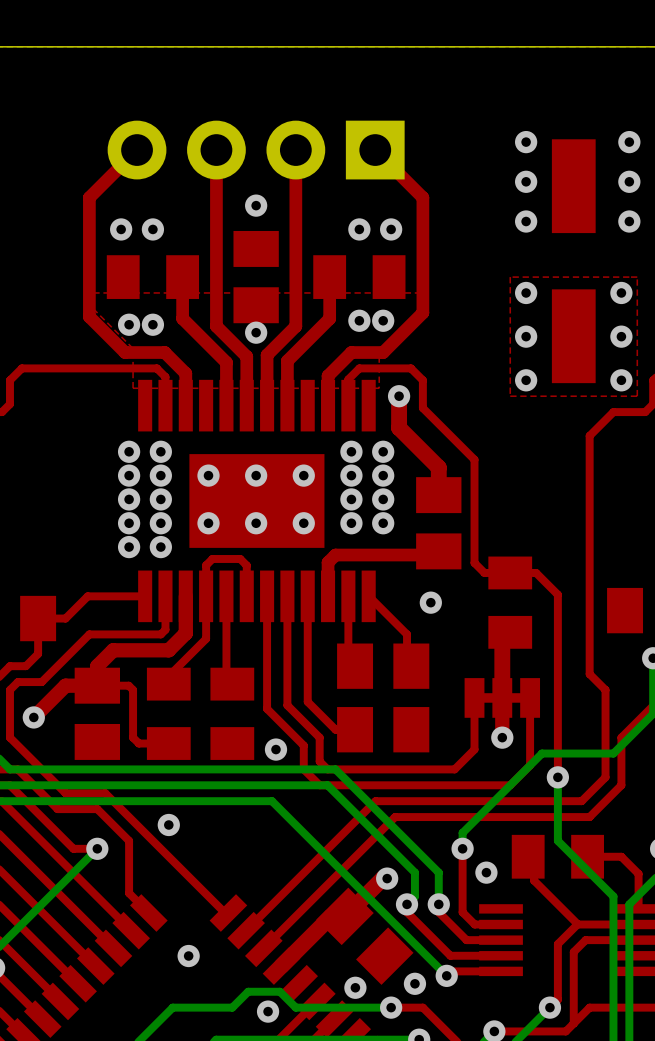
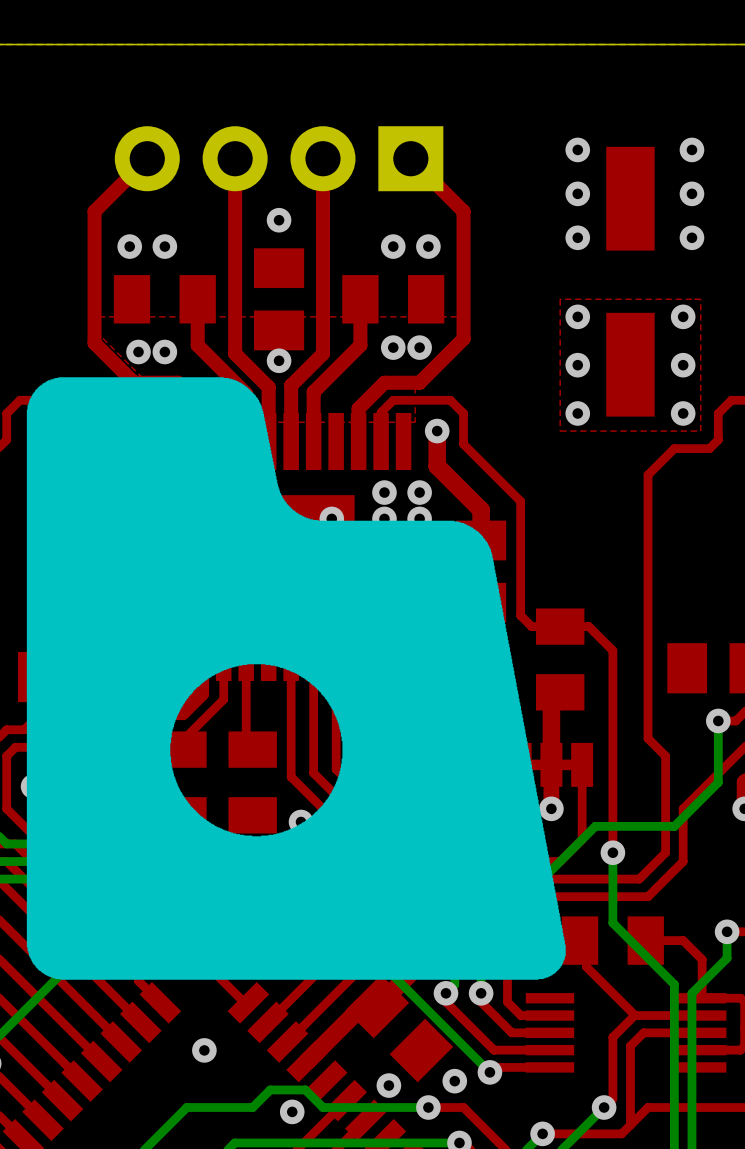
drawing: none -> [26, 377, 566, 980]

